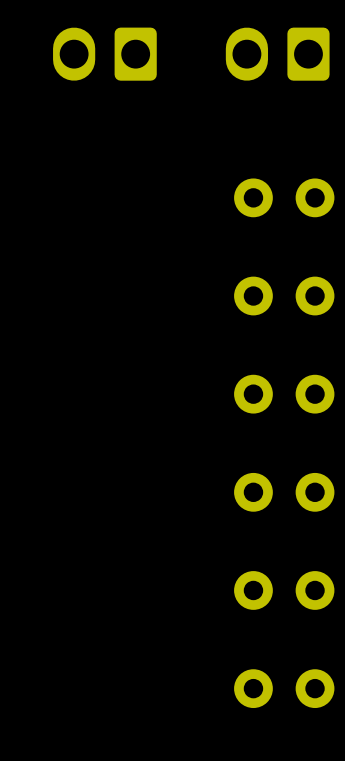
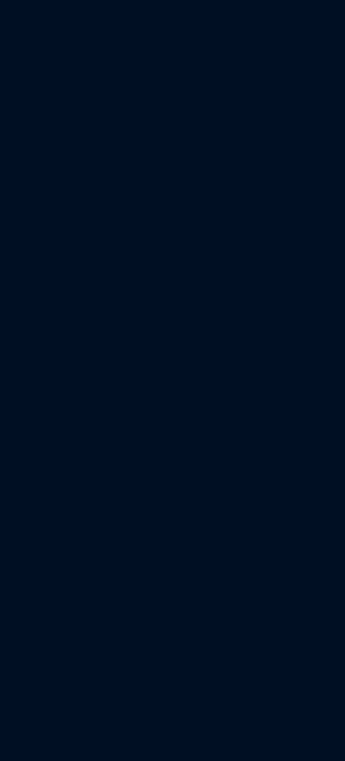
part: (104, 54) -> none
part: (277, 54) -> none
part: (284, 197) -> none
part: (284, 296) -> none
part: (284, 394) -> none
part: (284, 492) -> none
part: (284, 590) -> none
part: (284, 688) -> none

